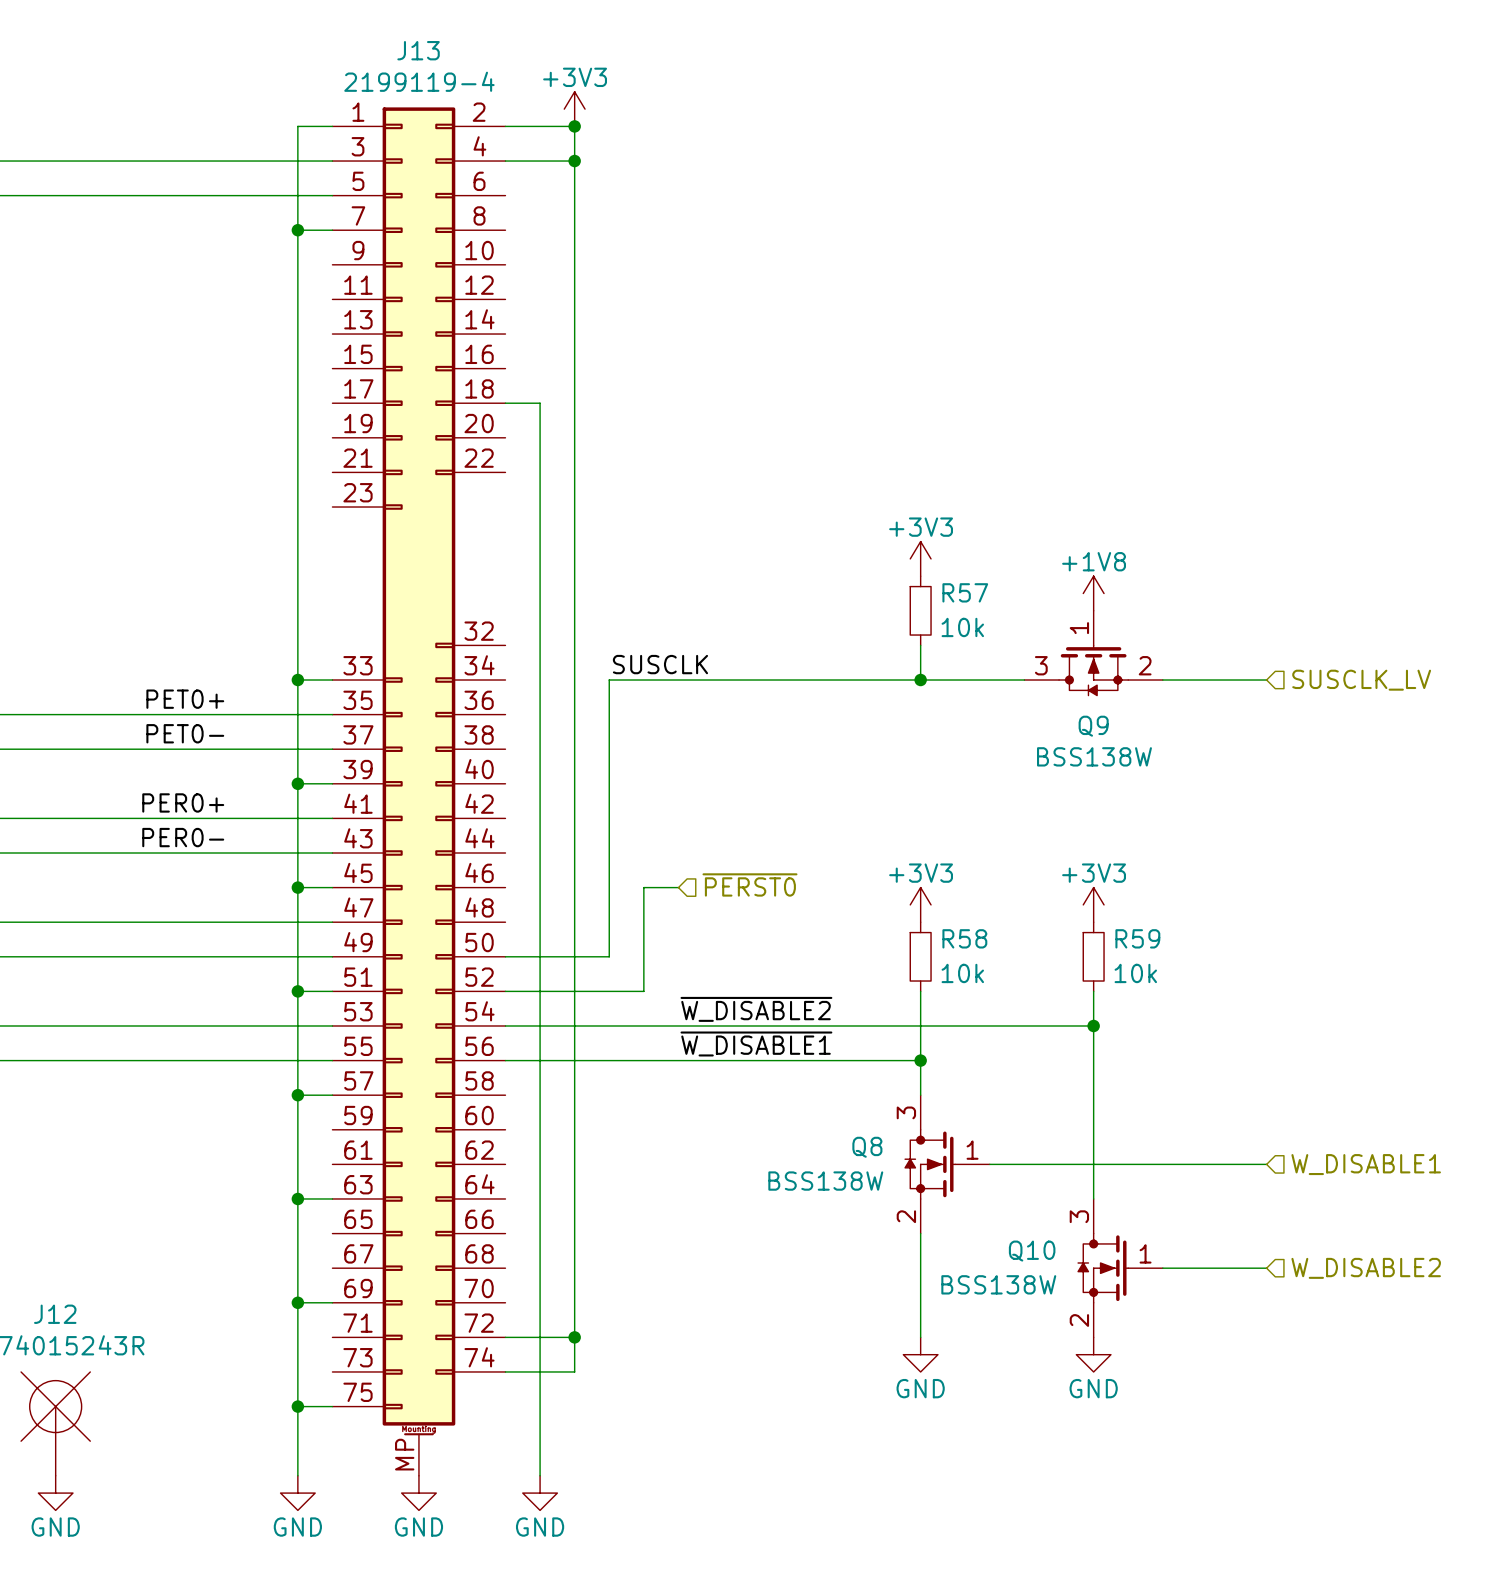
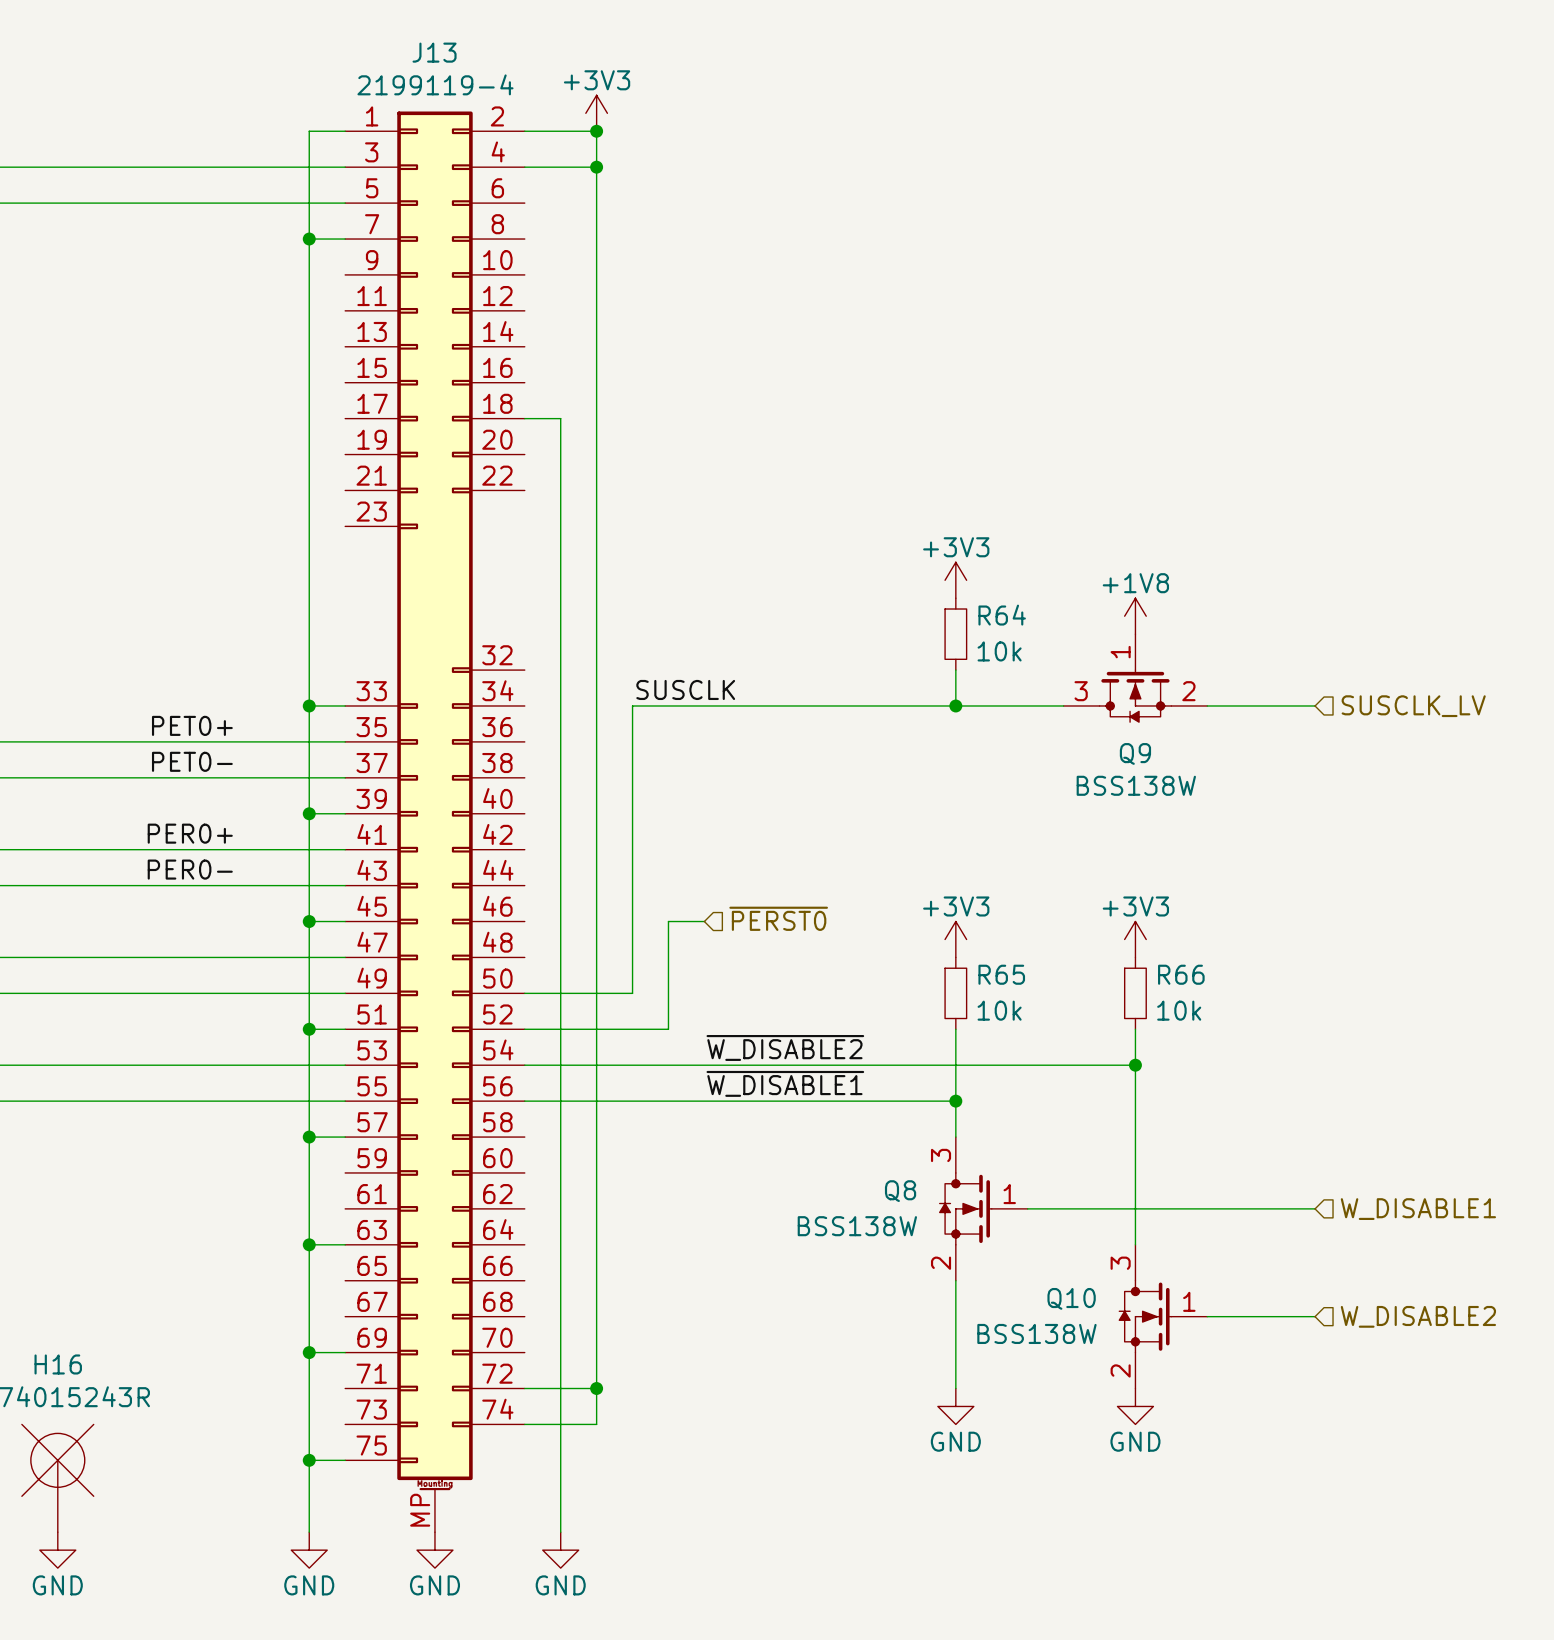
R57 name: R57 (965, 592) -> R64 (1002, 615)
R58 name: R58 (964, 938) -> R65 (1001, 974)
R59 name: R59 (1137, 938) -> R66 (1181, 974)
J12 name: J12 (55, 1314) -> H16 (58, 1364)

